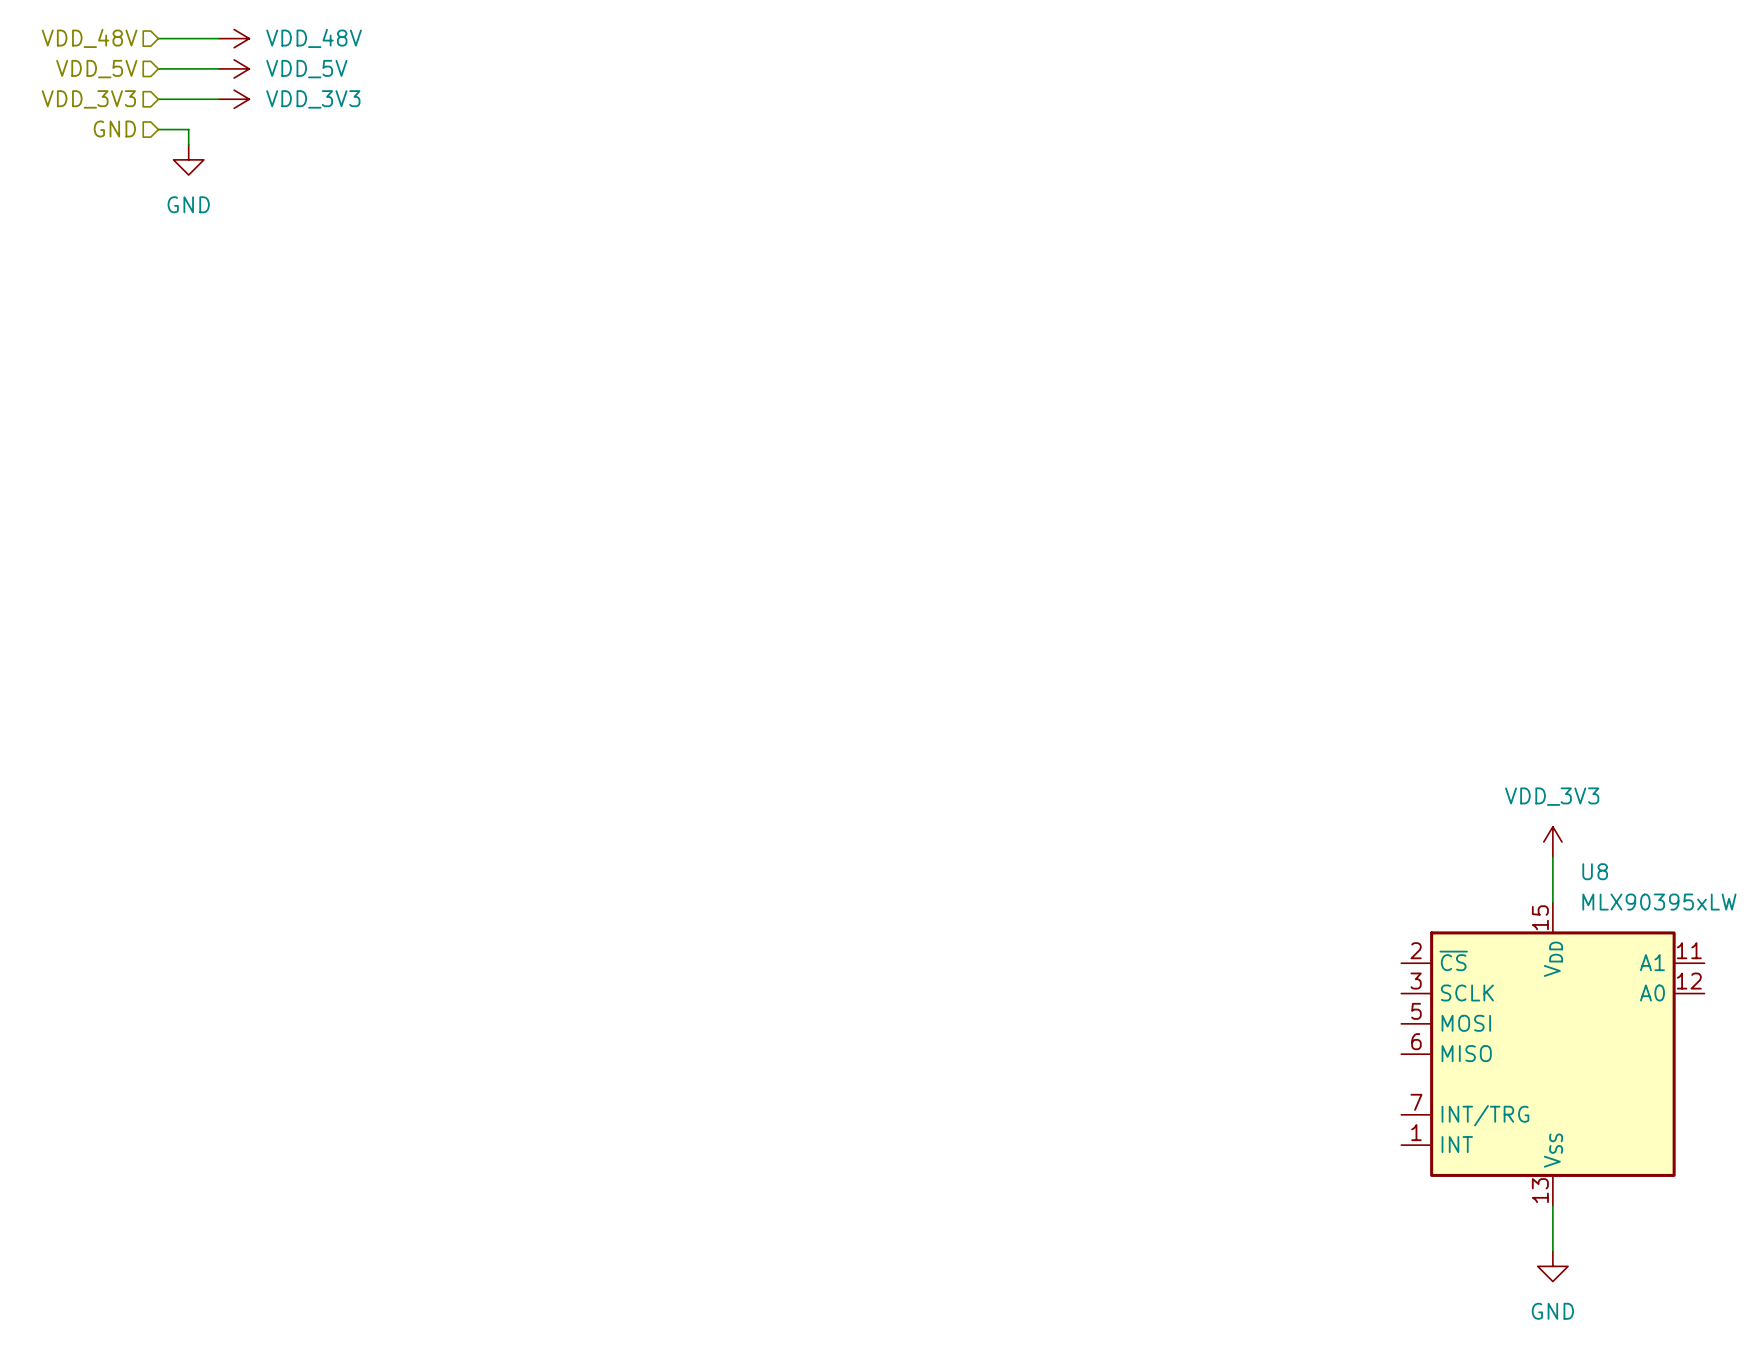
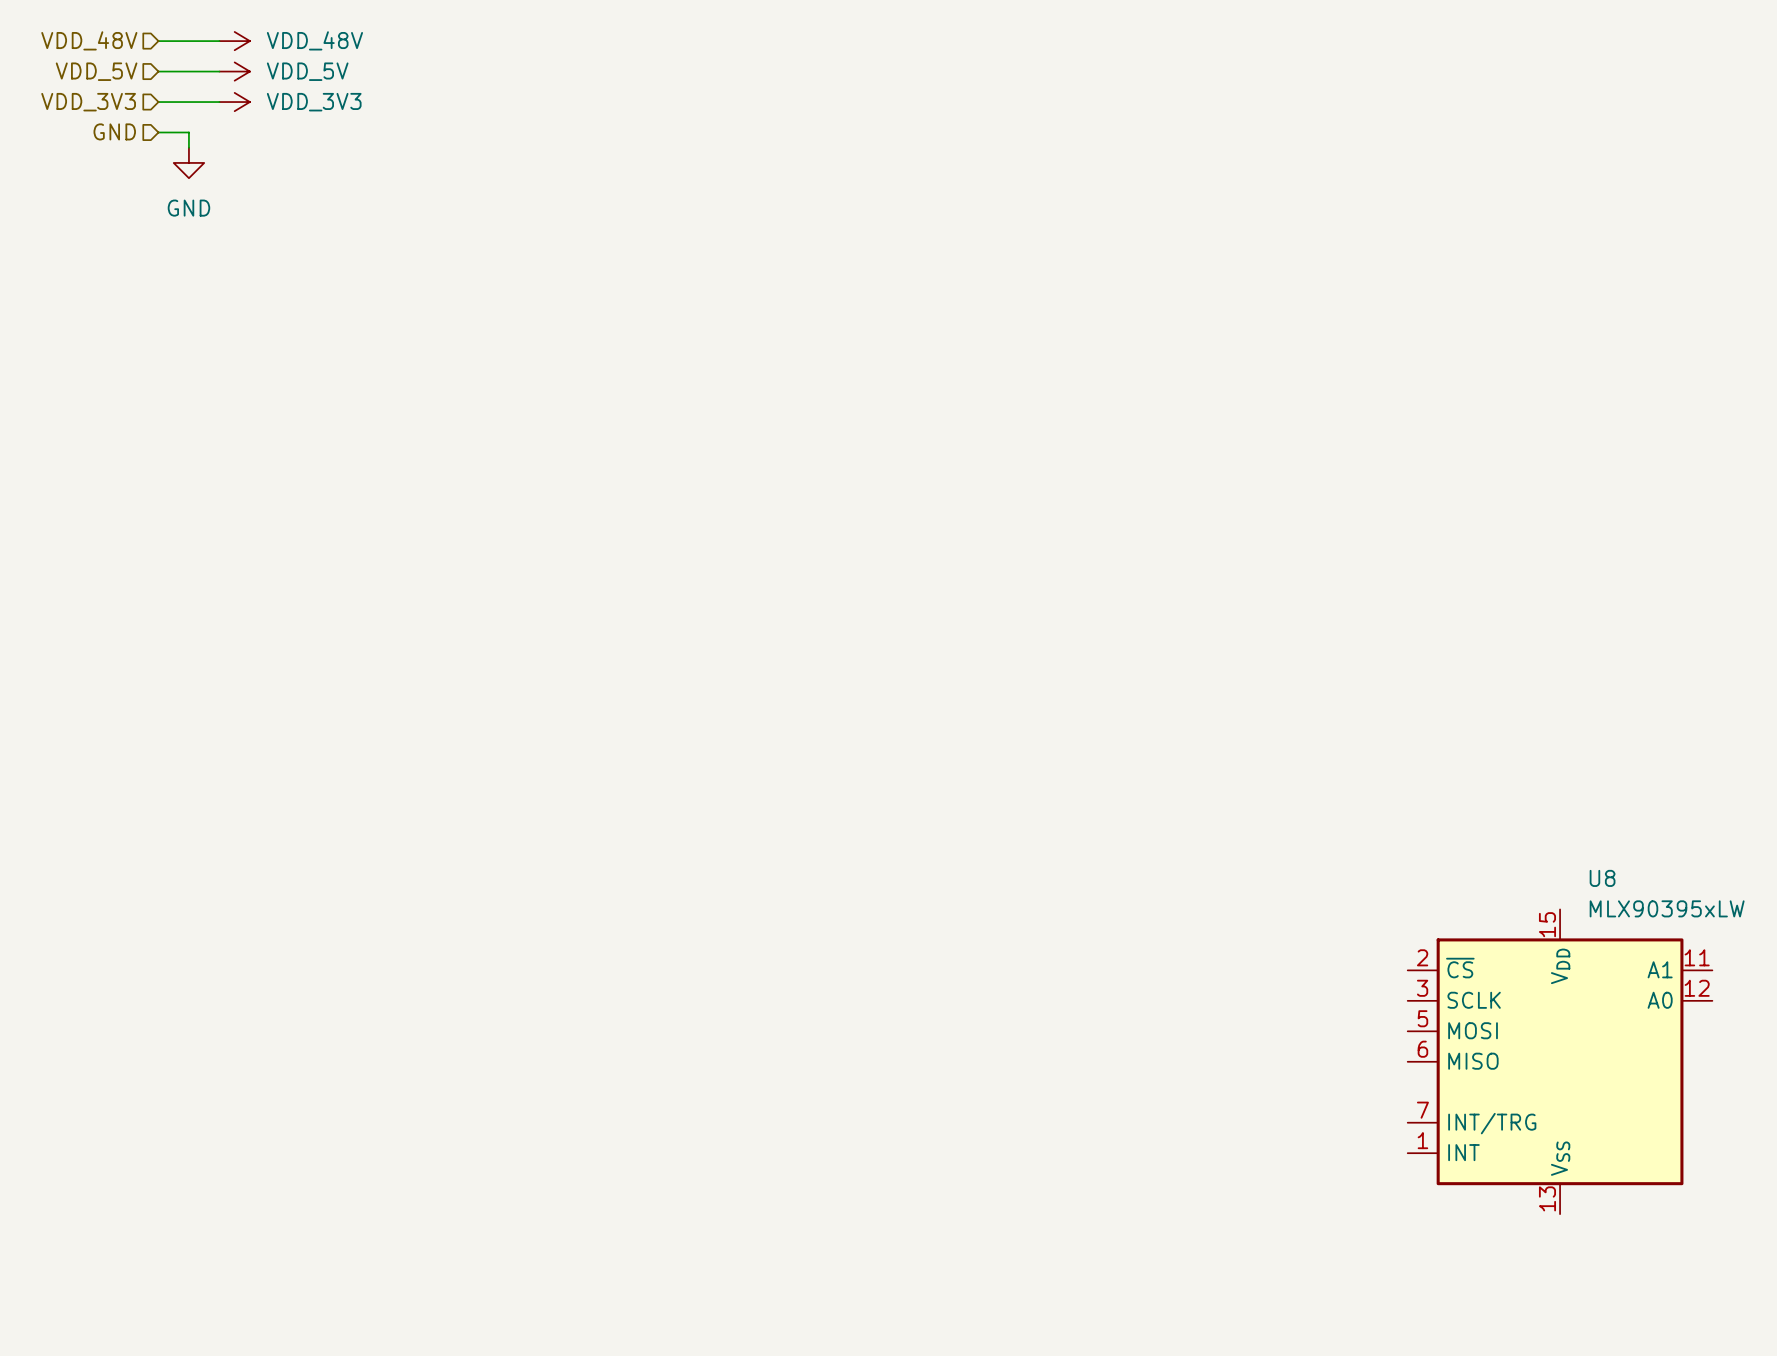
power symbol: VDD_3V3 (1552, 841) -> none
wire: (1552, 857) (1552, 902) -> none
wire: (1552, 1205) (1552, 1251) -> none
power symbol: GND (1552, 1266) -> none

